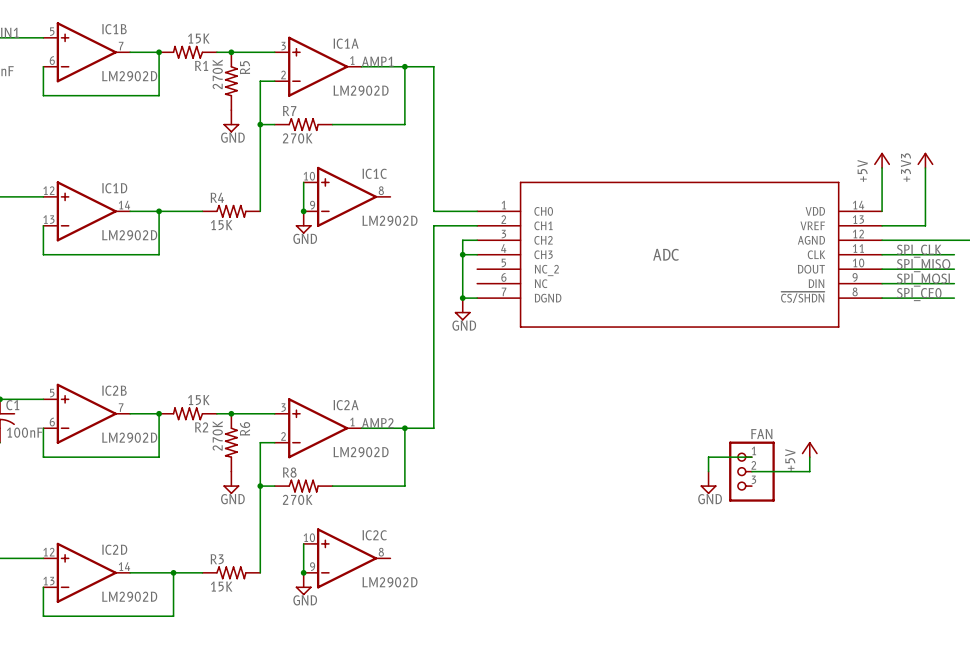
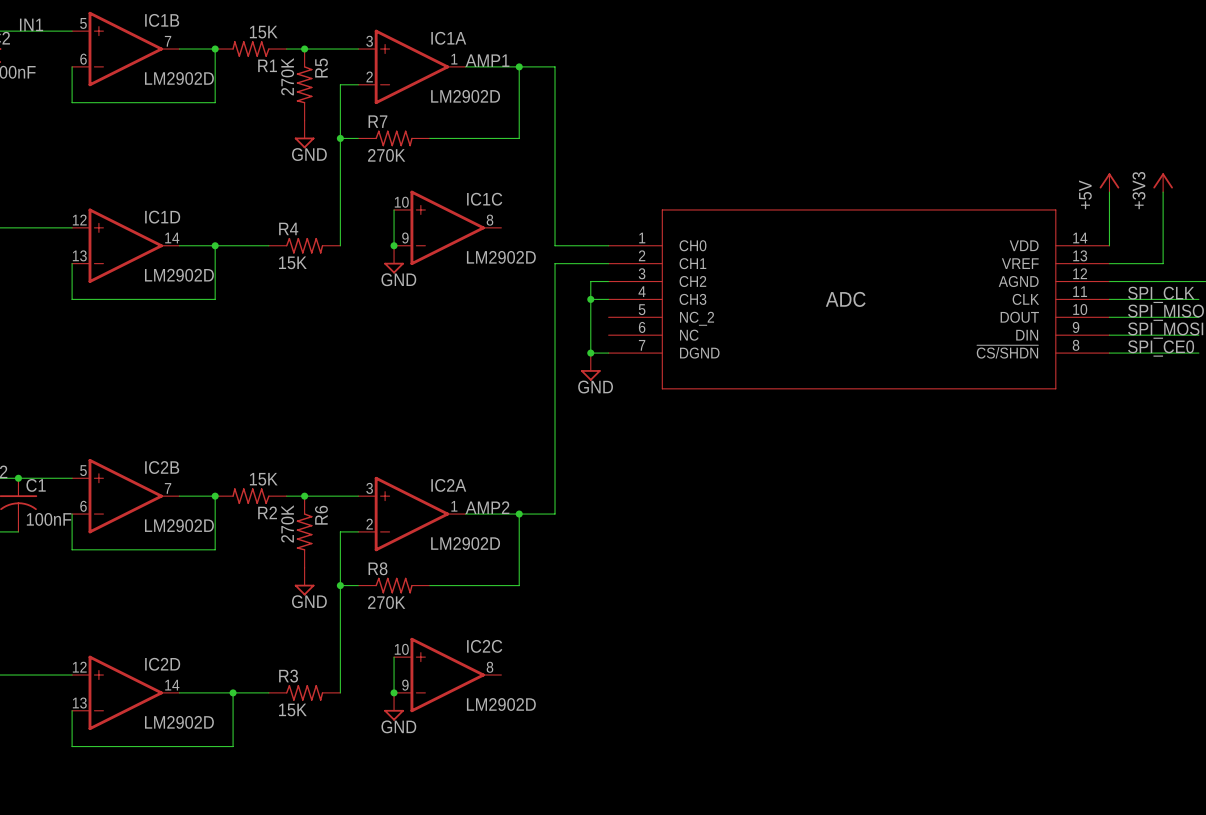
power symbol: +5V (809, 449) -> none
wire: (751, 457) (708, 457) (708, 471) -> none
wire: (809, 457) (809, 471) (751, 471) -> none
FAN: (751, 471) -> none
power symbol: GND (708, 482) -> none

